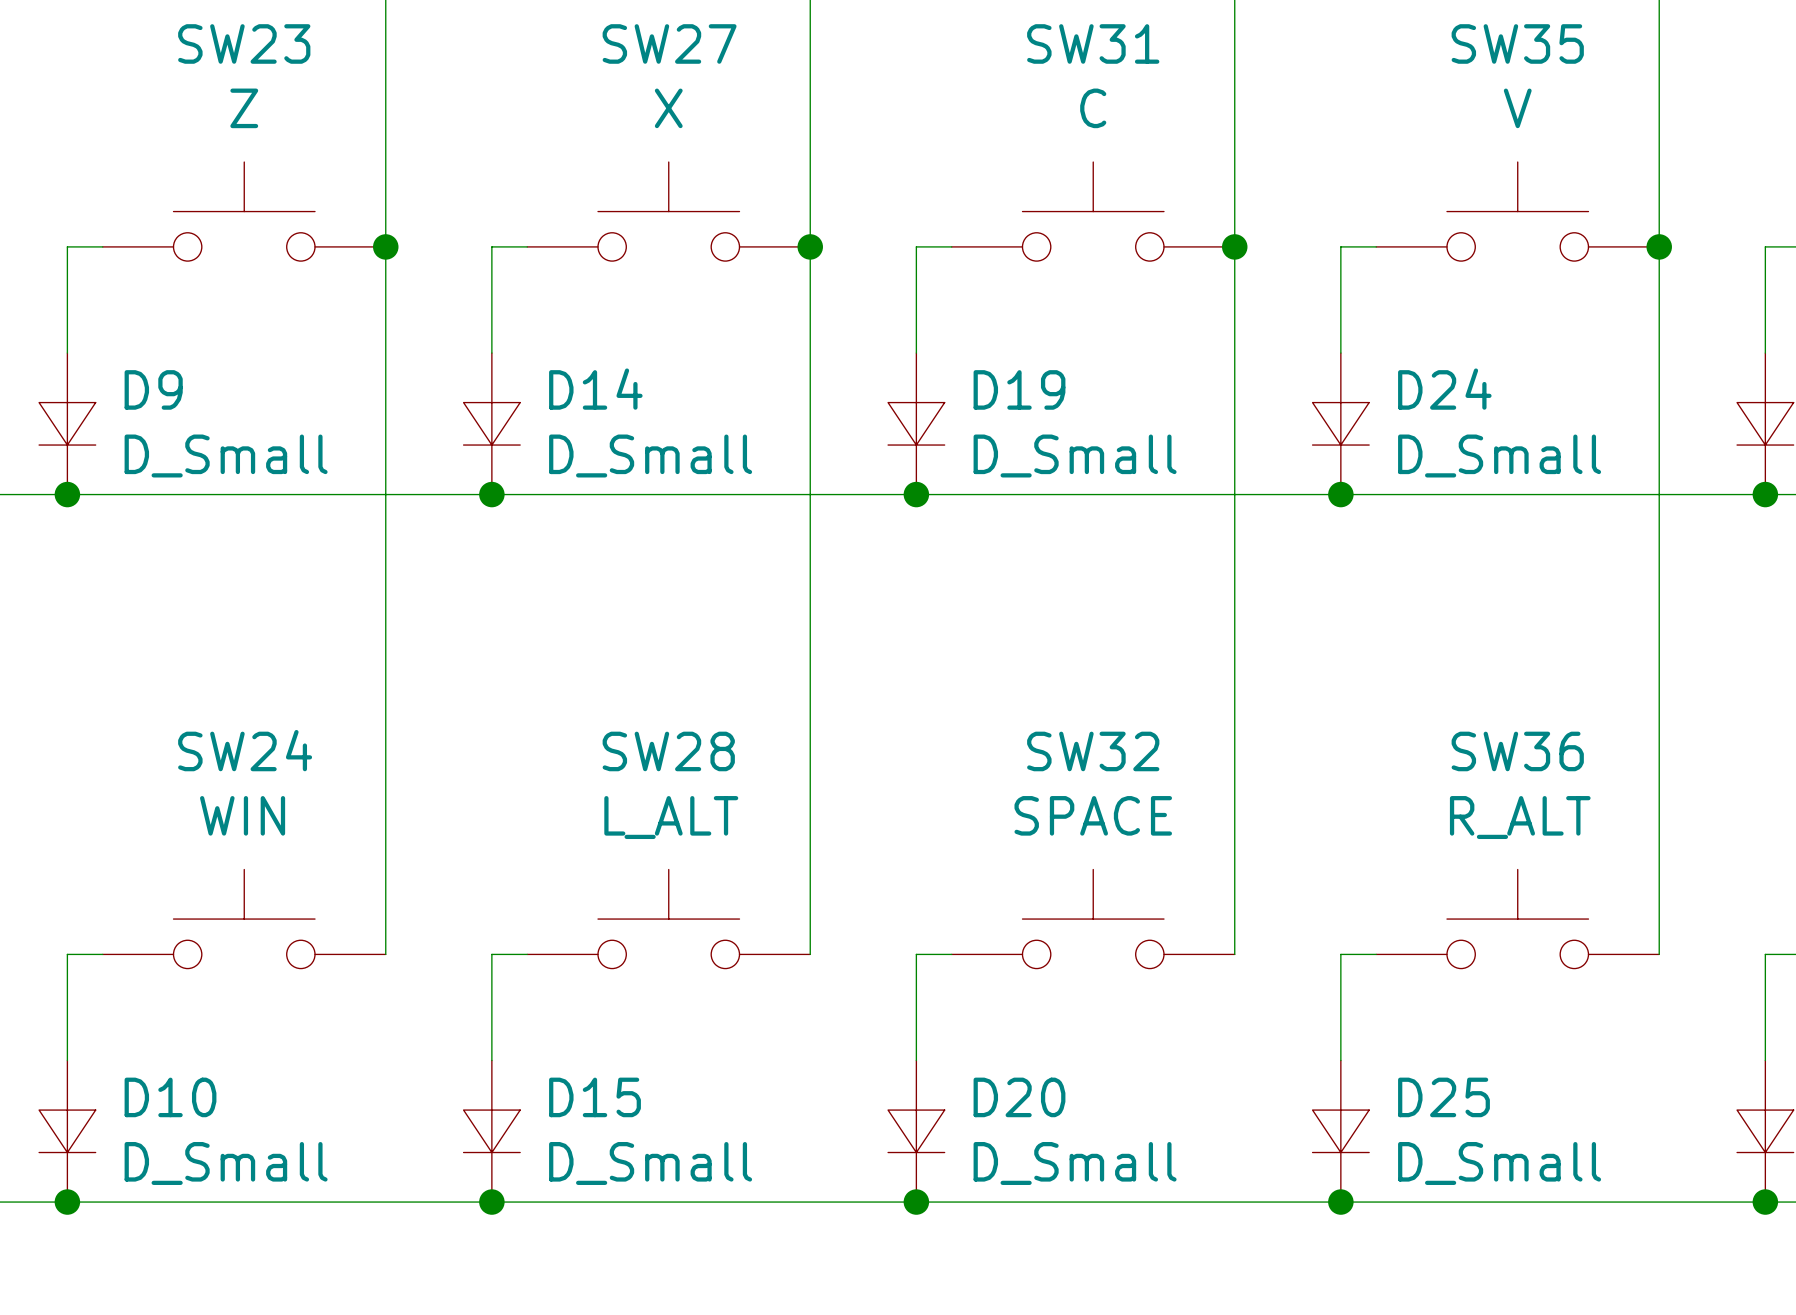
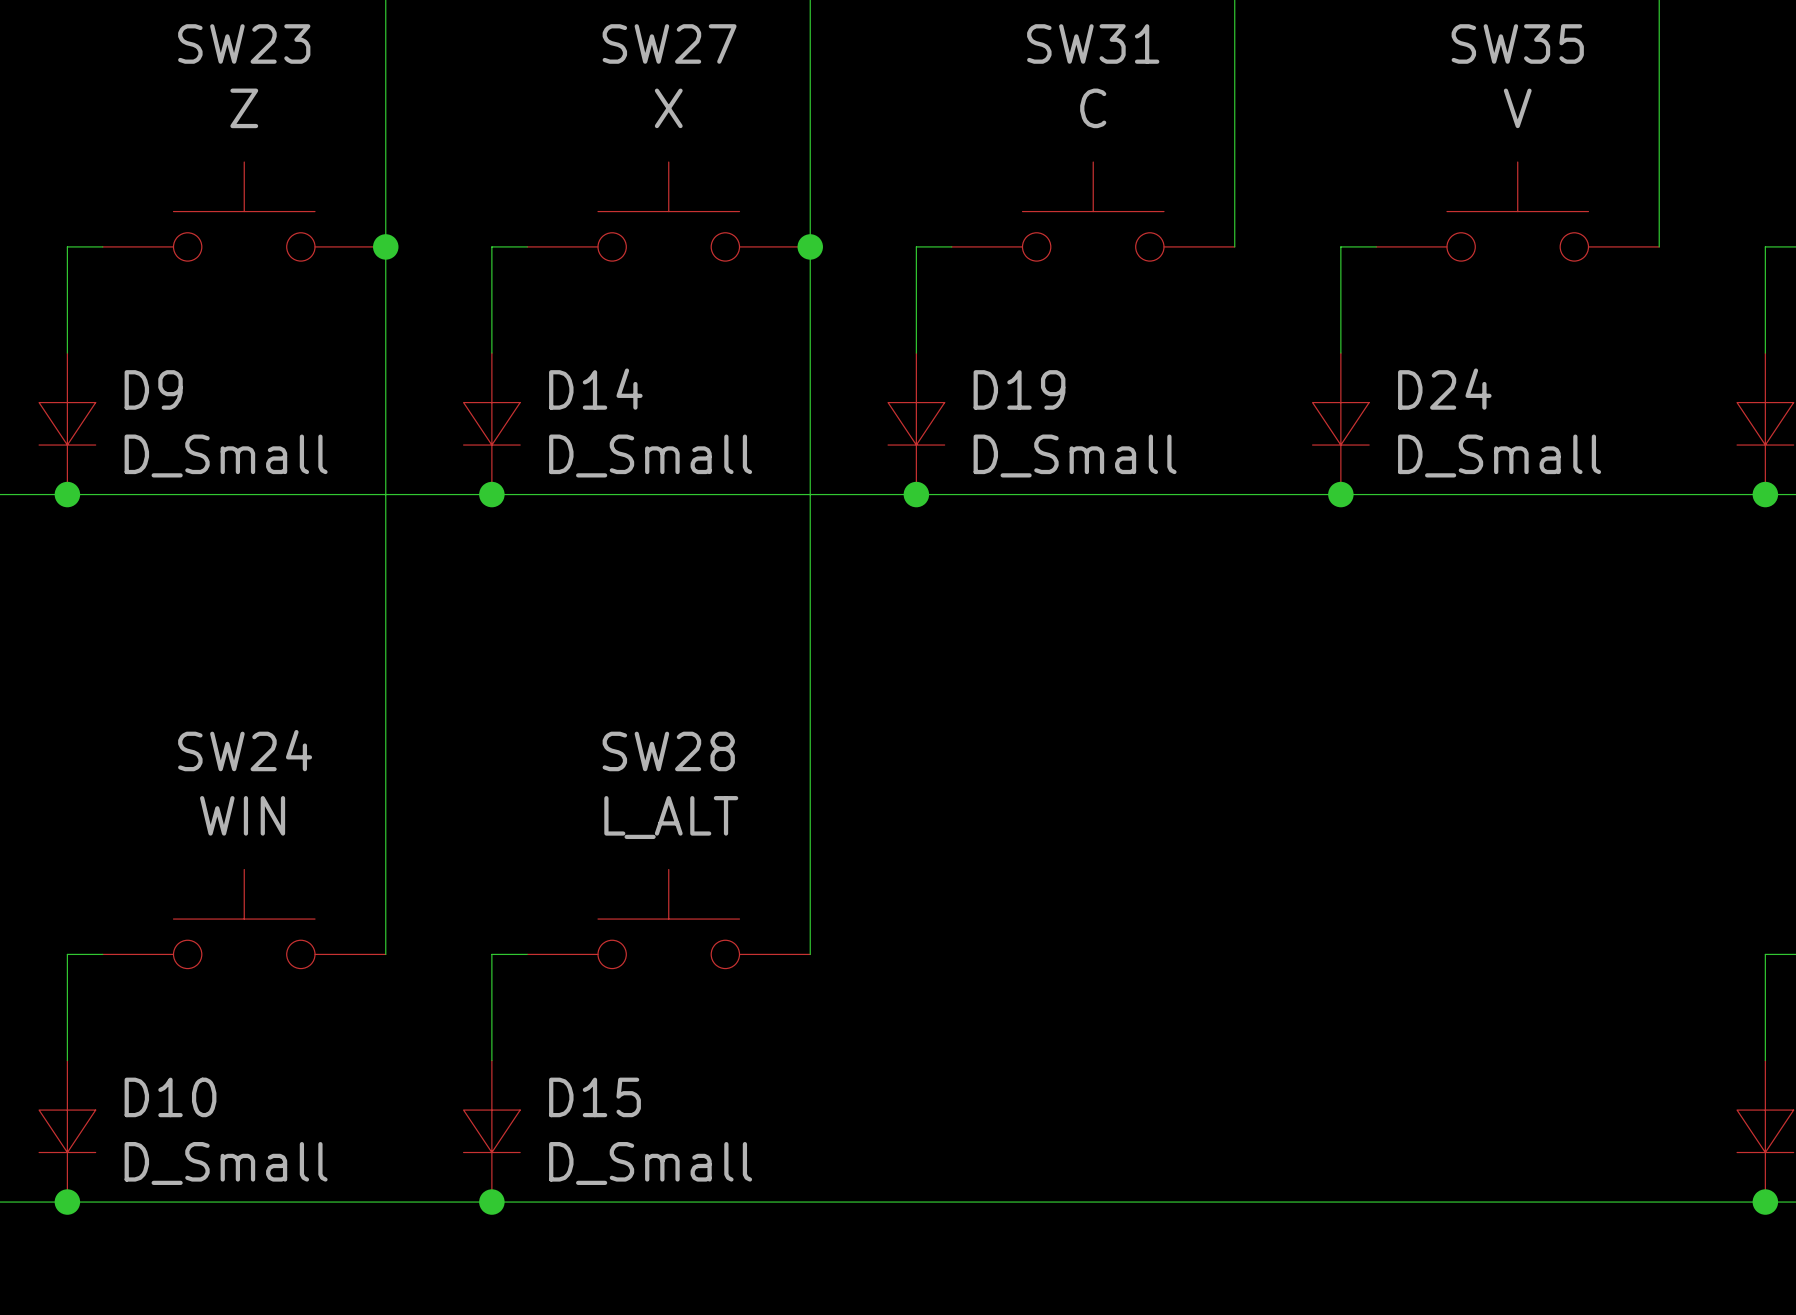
wire: (1234, 246) (1234, 954) -> none
junction: (1234, 246) -> none
wire: (1659, 246) (1659, 954) -> none
junction: (1659, 246) -> none
SW32: SPACE (1093, 919) -> none
SW36: R_ALT (1517, 919) -> none
wire: (951, 954) (916, 954) (916, 1060) -> none
wire: (1376, 954) (1340, 954) (1340, 1060) -> none
D20: D_Small (916, 1131) -> none
D25: D_Small (1340, 1131) -> none
junction: (916, 1202) -> none
junction: (1340, 1202) -> none

